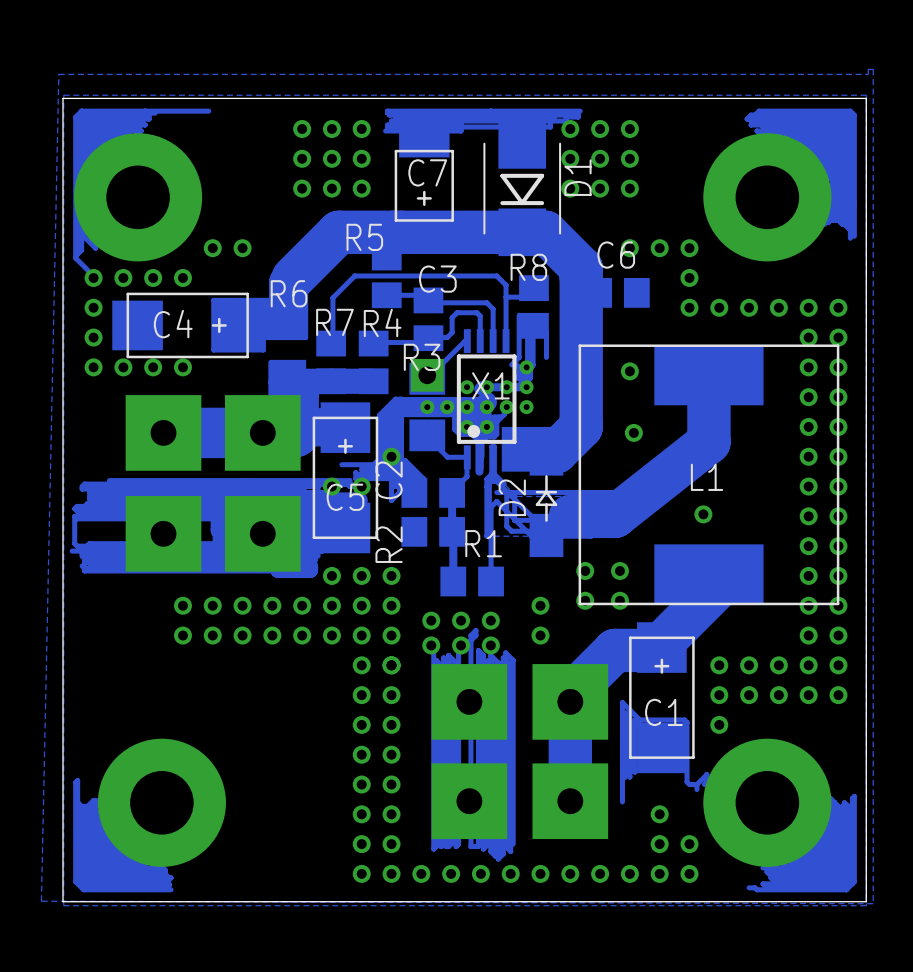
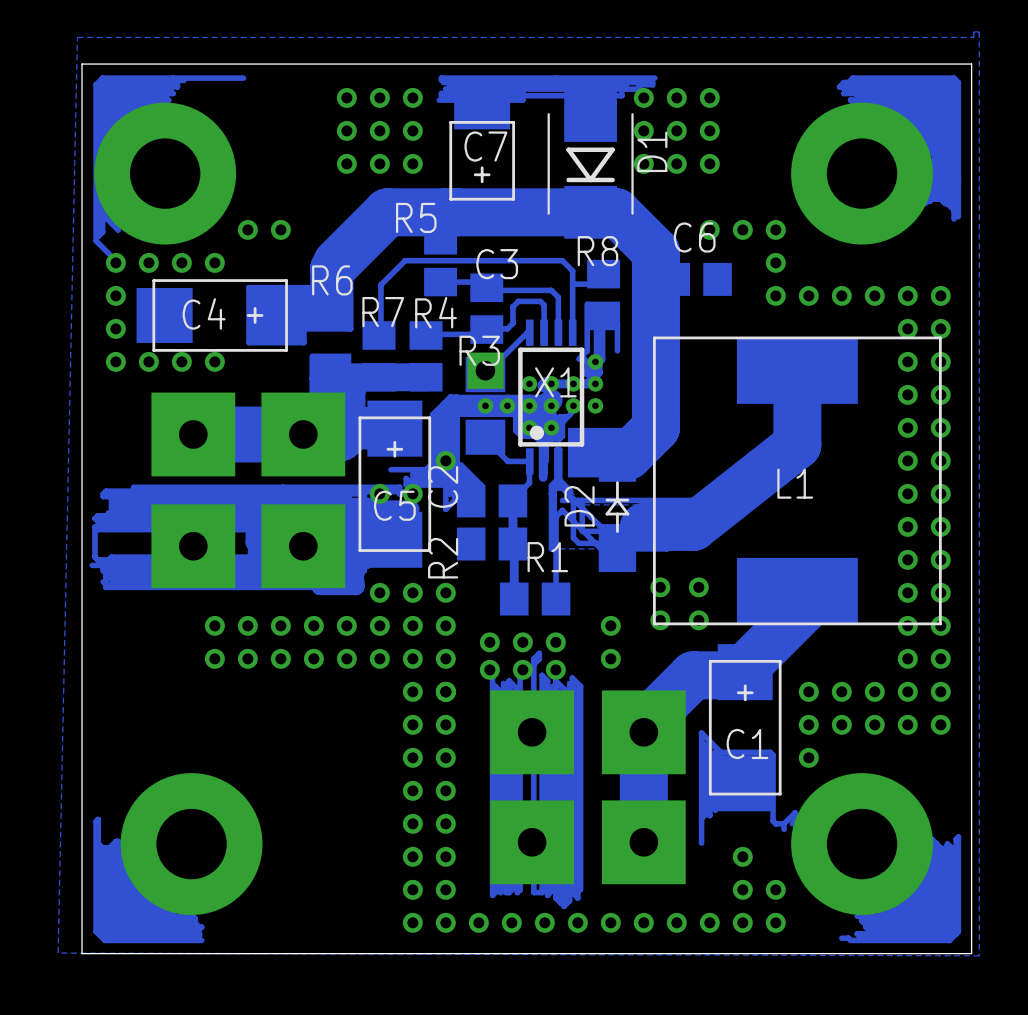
zone outline: (866, 95) (866, 905) (63, 905) (63, 95) (866, 95) -> none
via: (629, 371) -> none
via: (633, 432) -> none
via: (703, 514) -> none

